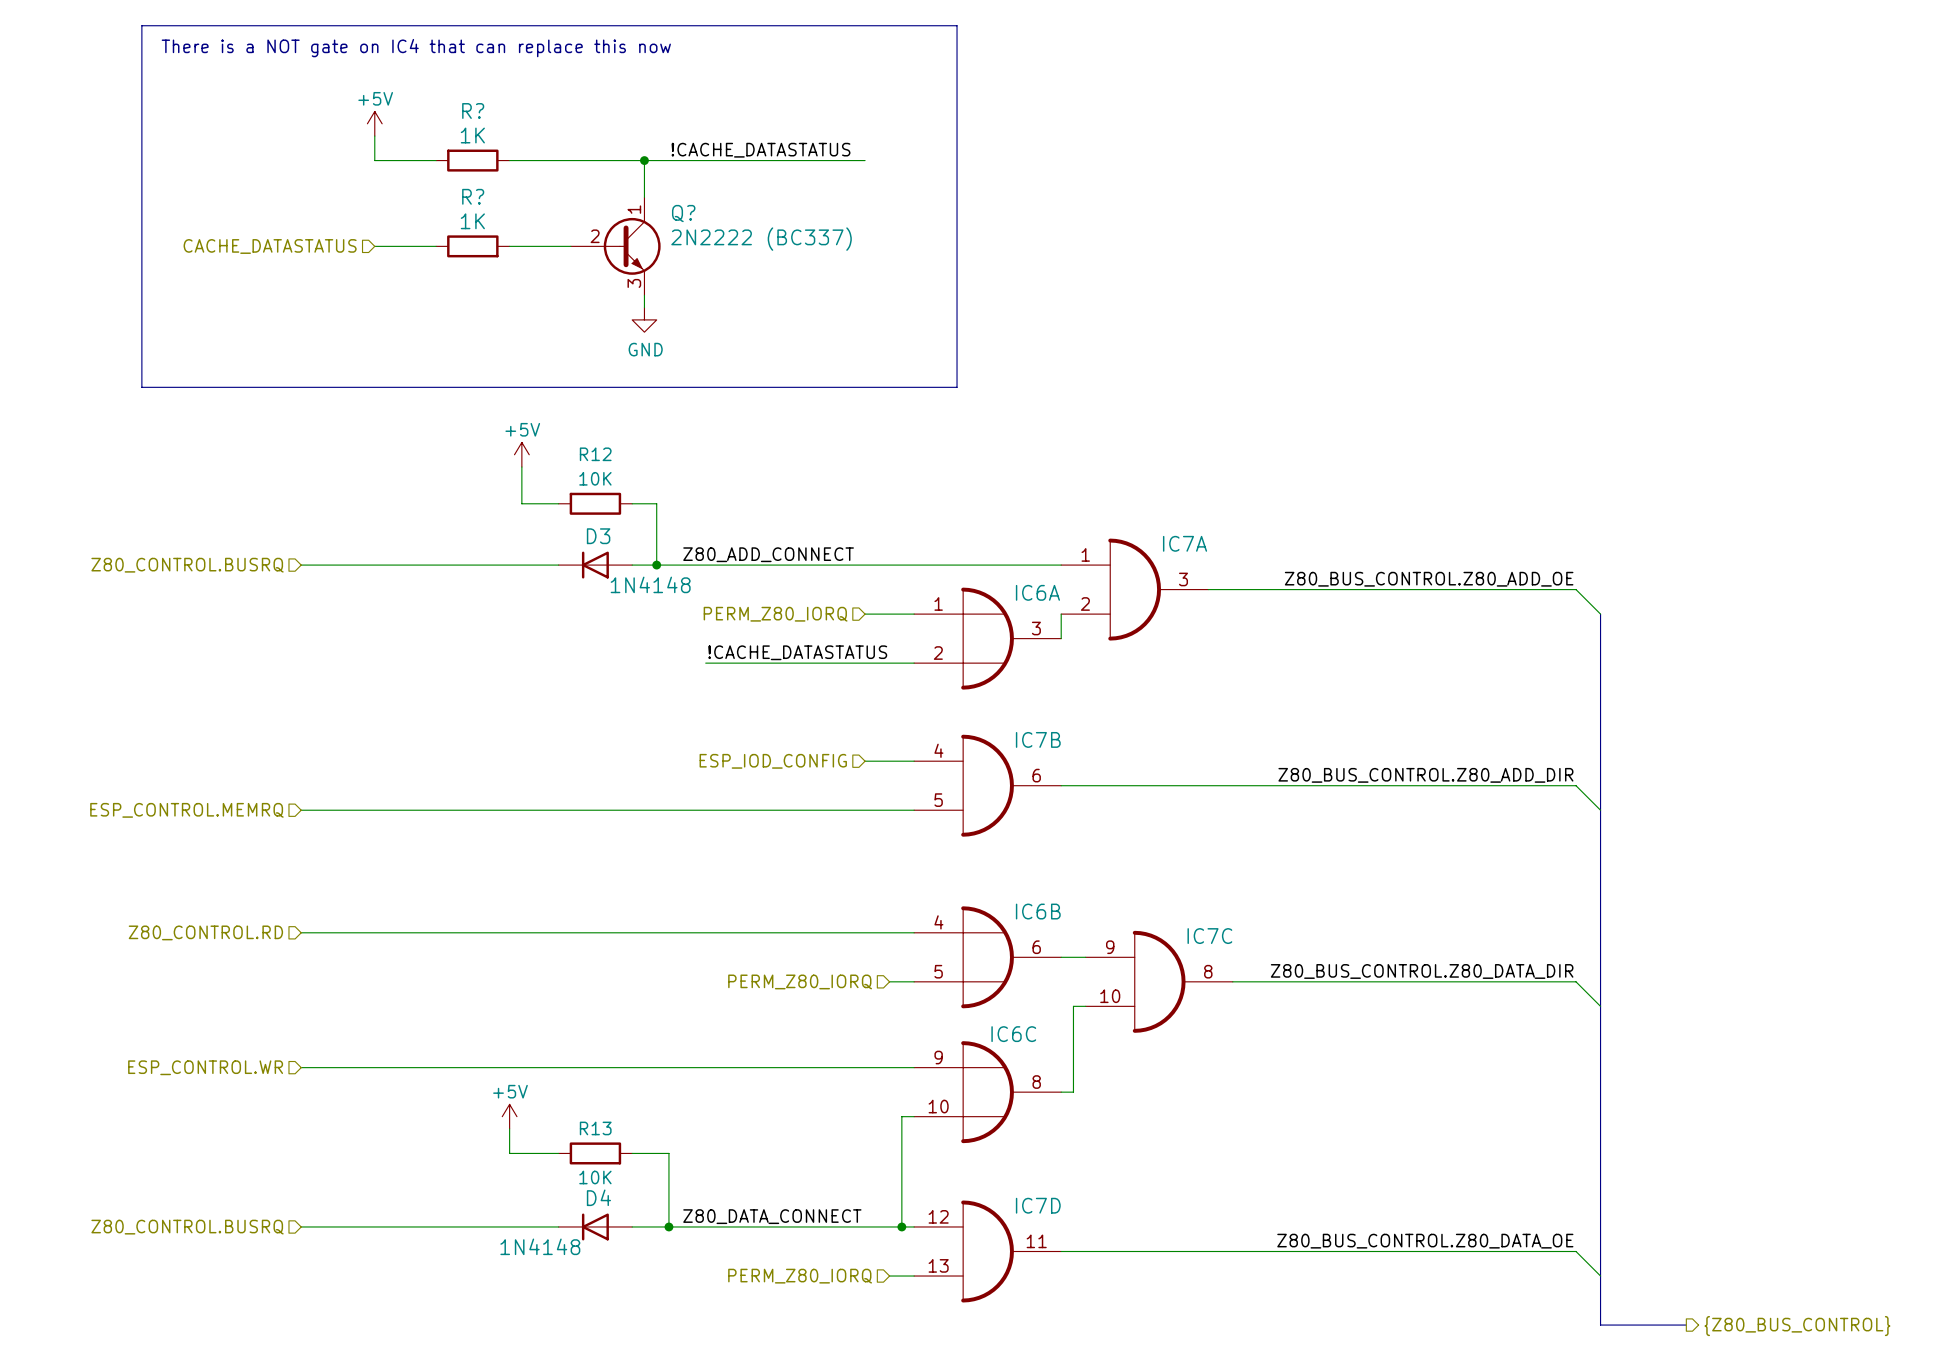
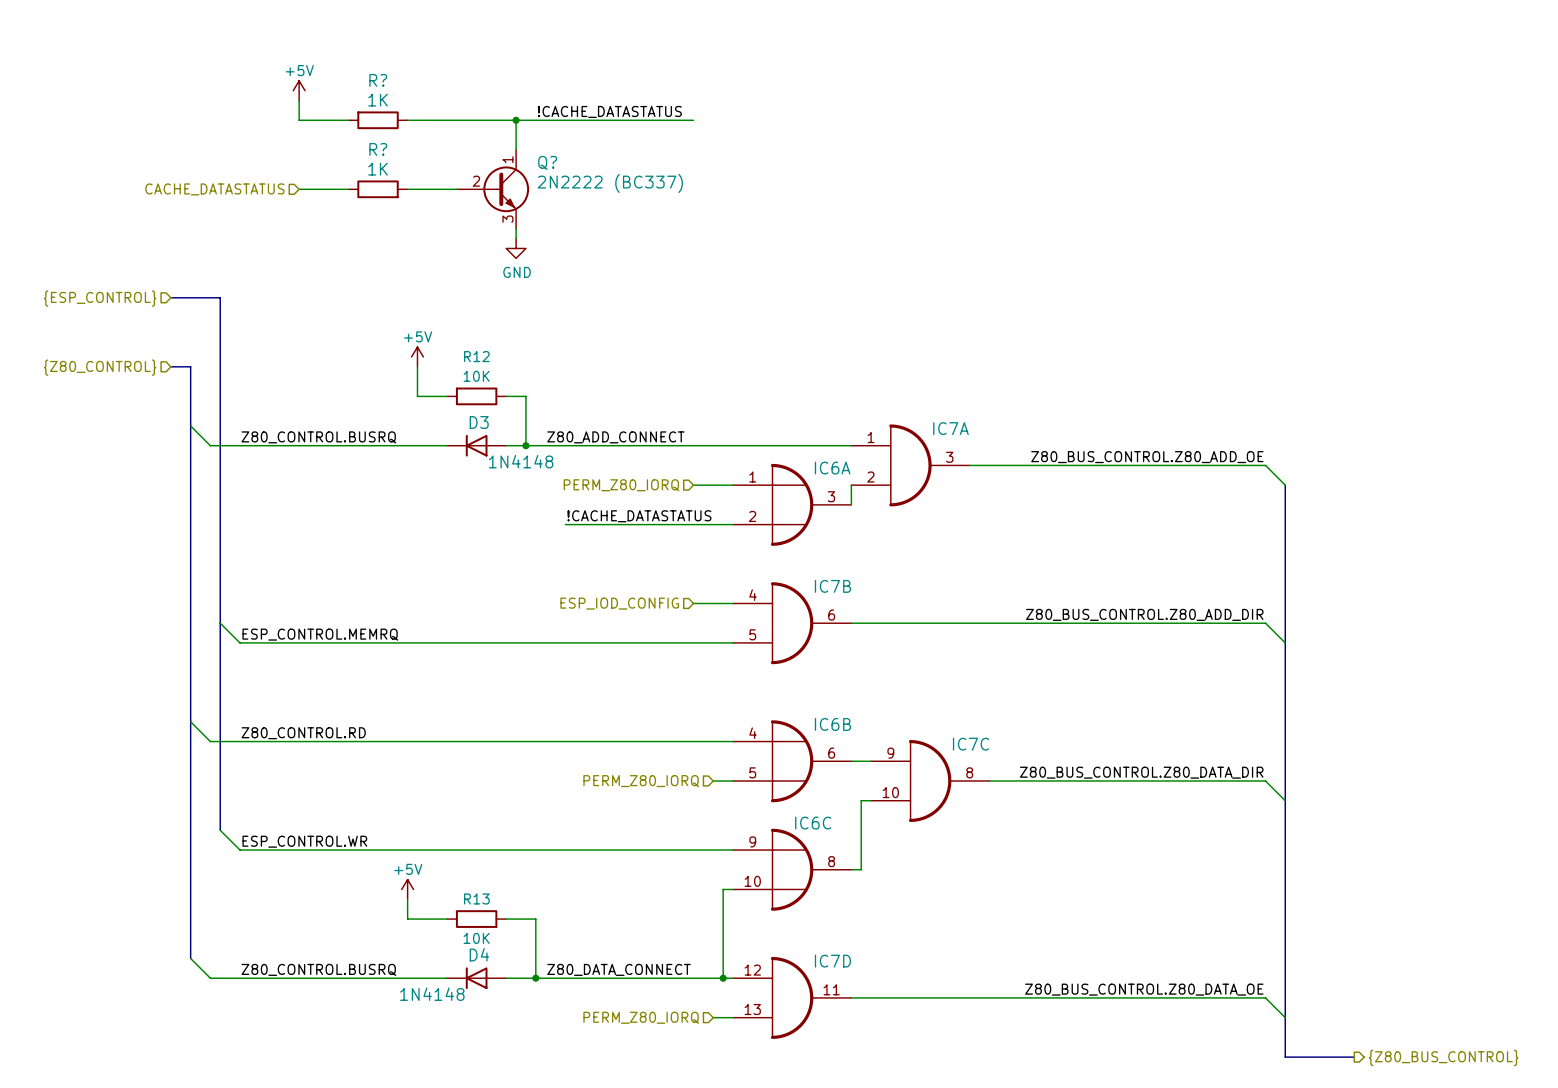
line: (141, 25) (957, 25) (957, 387) (141, 387) (141, 25) -> none
text: There is a NOT gate on IC4 that can replace this now (416, 48) -> none
bus: none -> (170, 297) (220, 297) (220, 830)
hierarchical label: none -> {ESP_CONTROL} (100, 298)
bus: none -> (170, 366) (190, 366) (190, 958)
hierarchical label: none -> {Z80_CONTROL} (100, 367)
wire: none -> (190, 425) (210, 445) (239, 445)
label: none -> Z80_CONTROL.BUSRQ (318, 437)
hierarchical label: Z80_CONTROL.BUSRQ (187, 565) -> none
wire: none -> (220, 623) (239, 642)
label: none -> ESP_CONTROL.MEMRQ (320, 634)
hierarchical label: ESP_CONTROL.MEMRQ (186, 810) -> none
wire: none -> (190, 721) (210, 741) (239, 741)
label: none -> Z80_CONTROL.RD (303, 733)
hierarchical label: Z80_CONTROL.RD (205, 932) -> none
wire: none -> (220, 830) (239, 850)
label: none -> ESP_CONTROL.WR (304, 841)
hierarchical label: ESP_CONTROL.WR (205, 1067) -> none
wire: none -> (190, 958) (210, 978) (239, 978)
label: none -> Z80_CONTROL.BUSRQ (318, 969)
hierarchical label: Z80_CONTROL.BUSRQ (187, 1227) -> none

